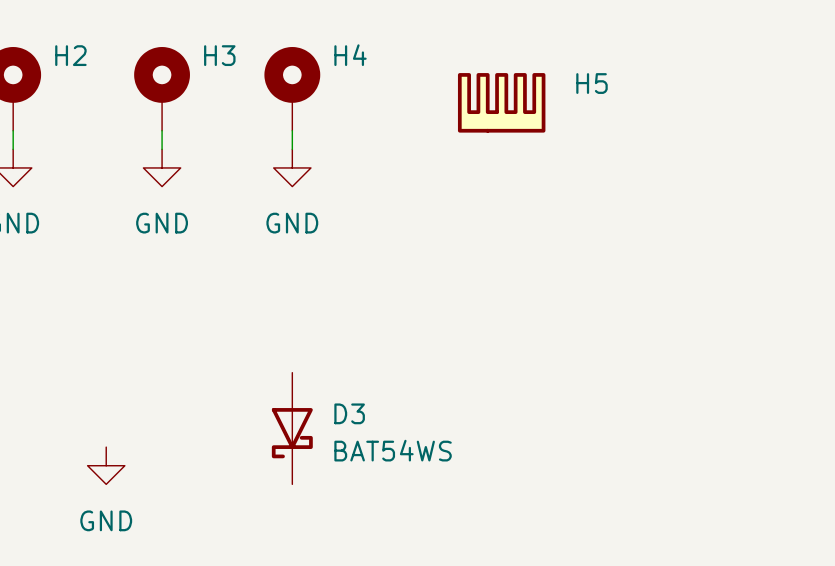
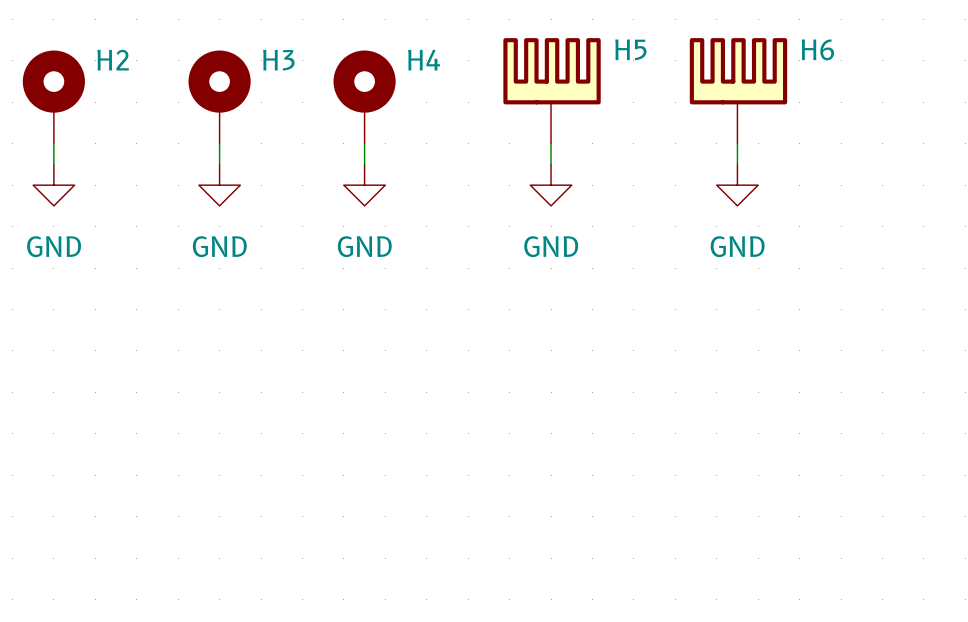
H5 symbol: [457, 73, 546, 133] -> [503, 38, 601, 144]
H6: none -> (738, 90)
wire: none -> (551, 143) (551, 164)
wire: none -> (737, 143) (737, 164)
power symbol: none -> GND (551, 185)
power symbol: none -> GND (737, 185)
D3: BAT54WS (292, 428) -> none
power symbol: GND (106, 465) -> none

